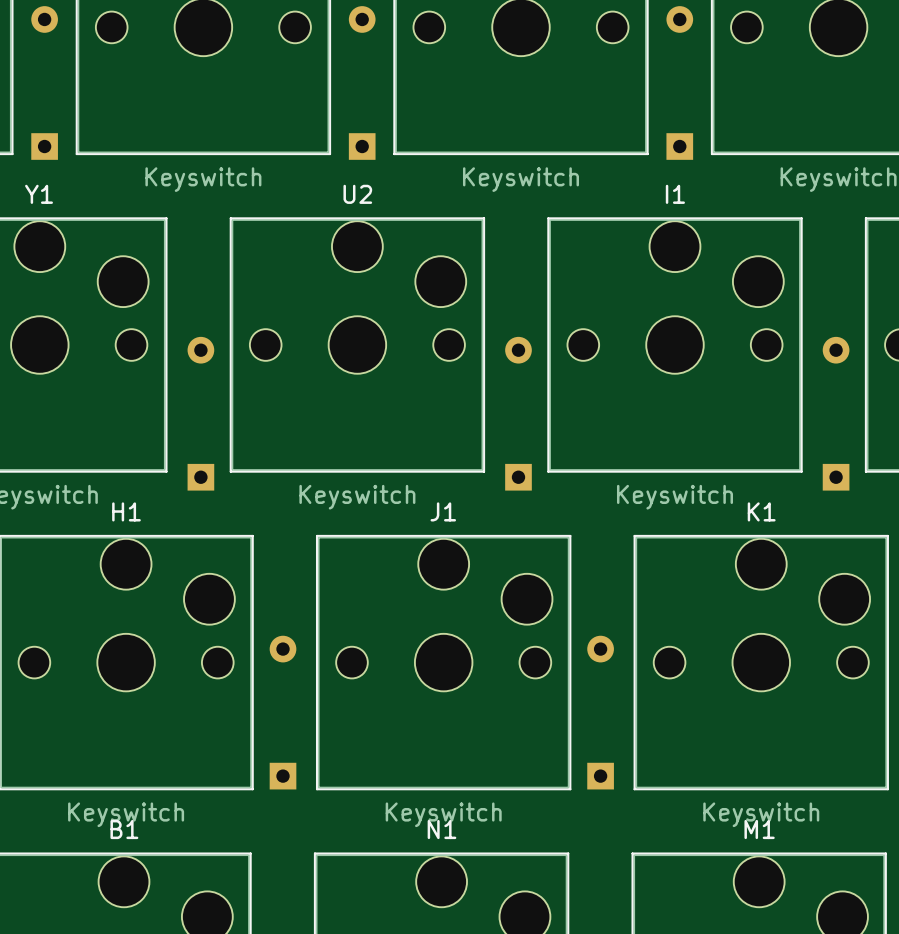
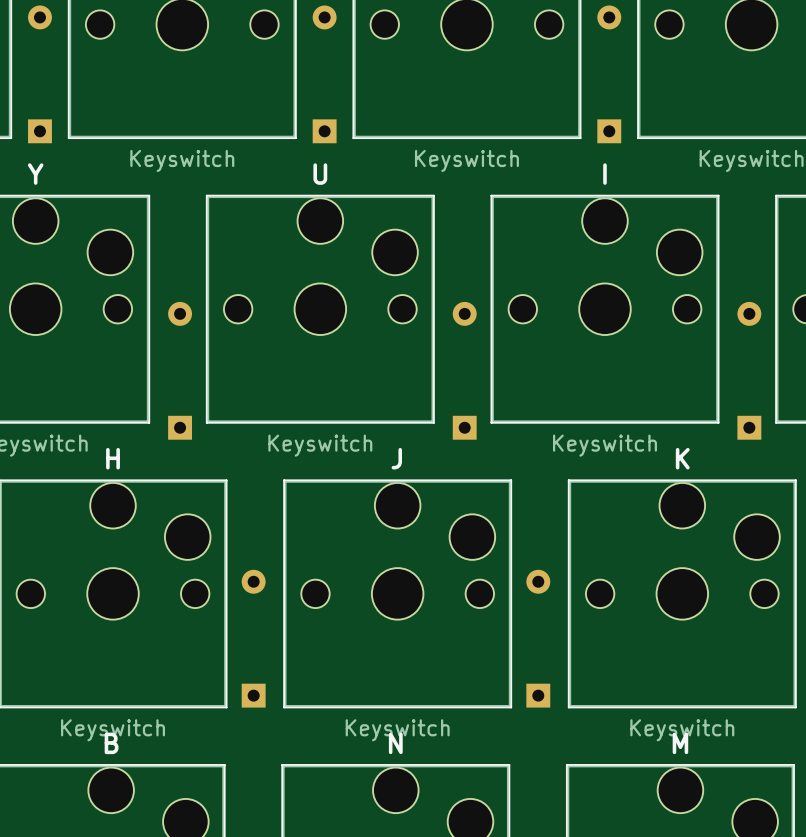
Y1 name: Y1 (39, 194) -> Y (35, 174)
U2 name: U2 (357, 194) -> U (320, 174)
I1 name: I1 (675, 194) -> I (604, 174)
H1 name: H1 (126, 511) -> H (113, 458)
J1 name: J1 (443, 511) -> J (396, 458)
K1 name: K1 (761, 511) -> K (682, 458)
B1 name: B1 (124, 829) -> B (111, 743)
N1 name: N1 (441, 829) -> N (395, 743)
M1 name: M1 (759, 829) -> M (680, 743)

